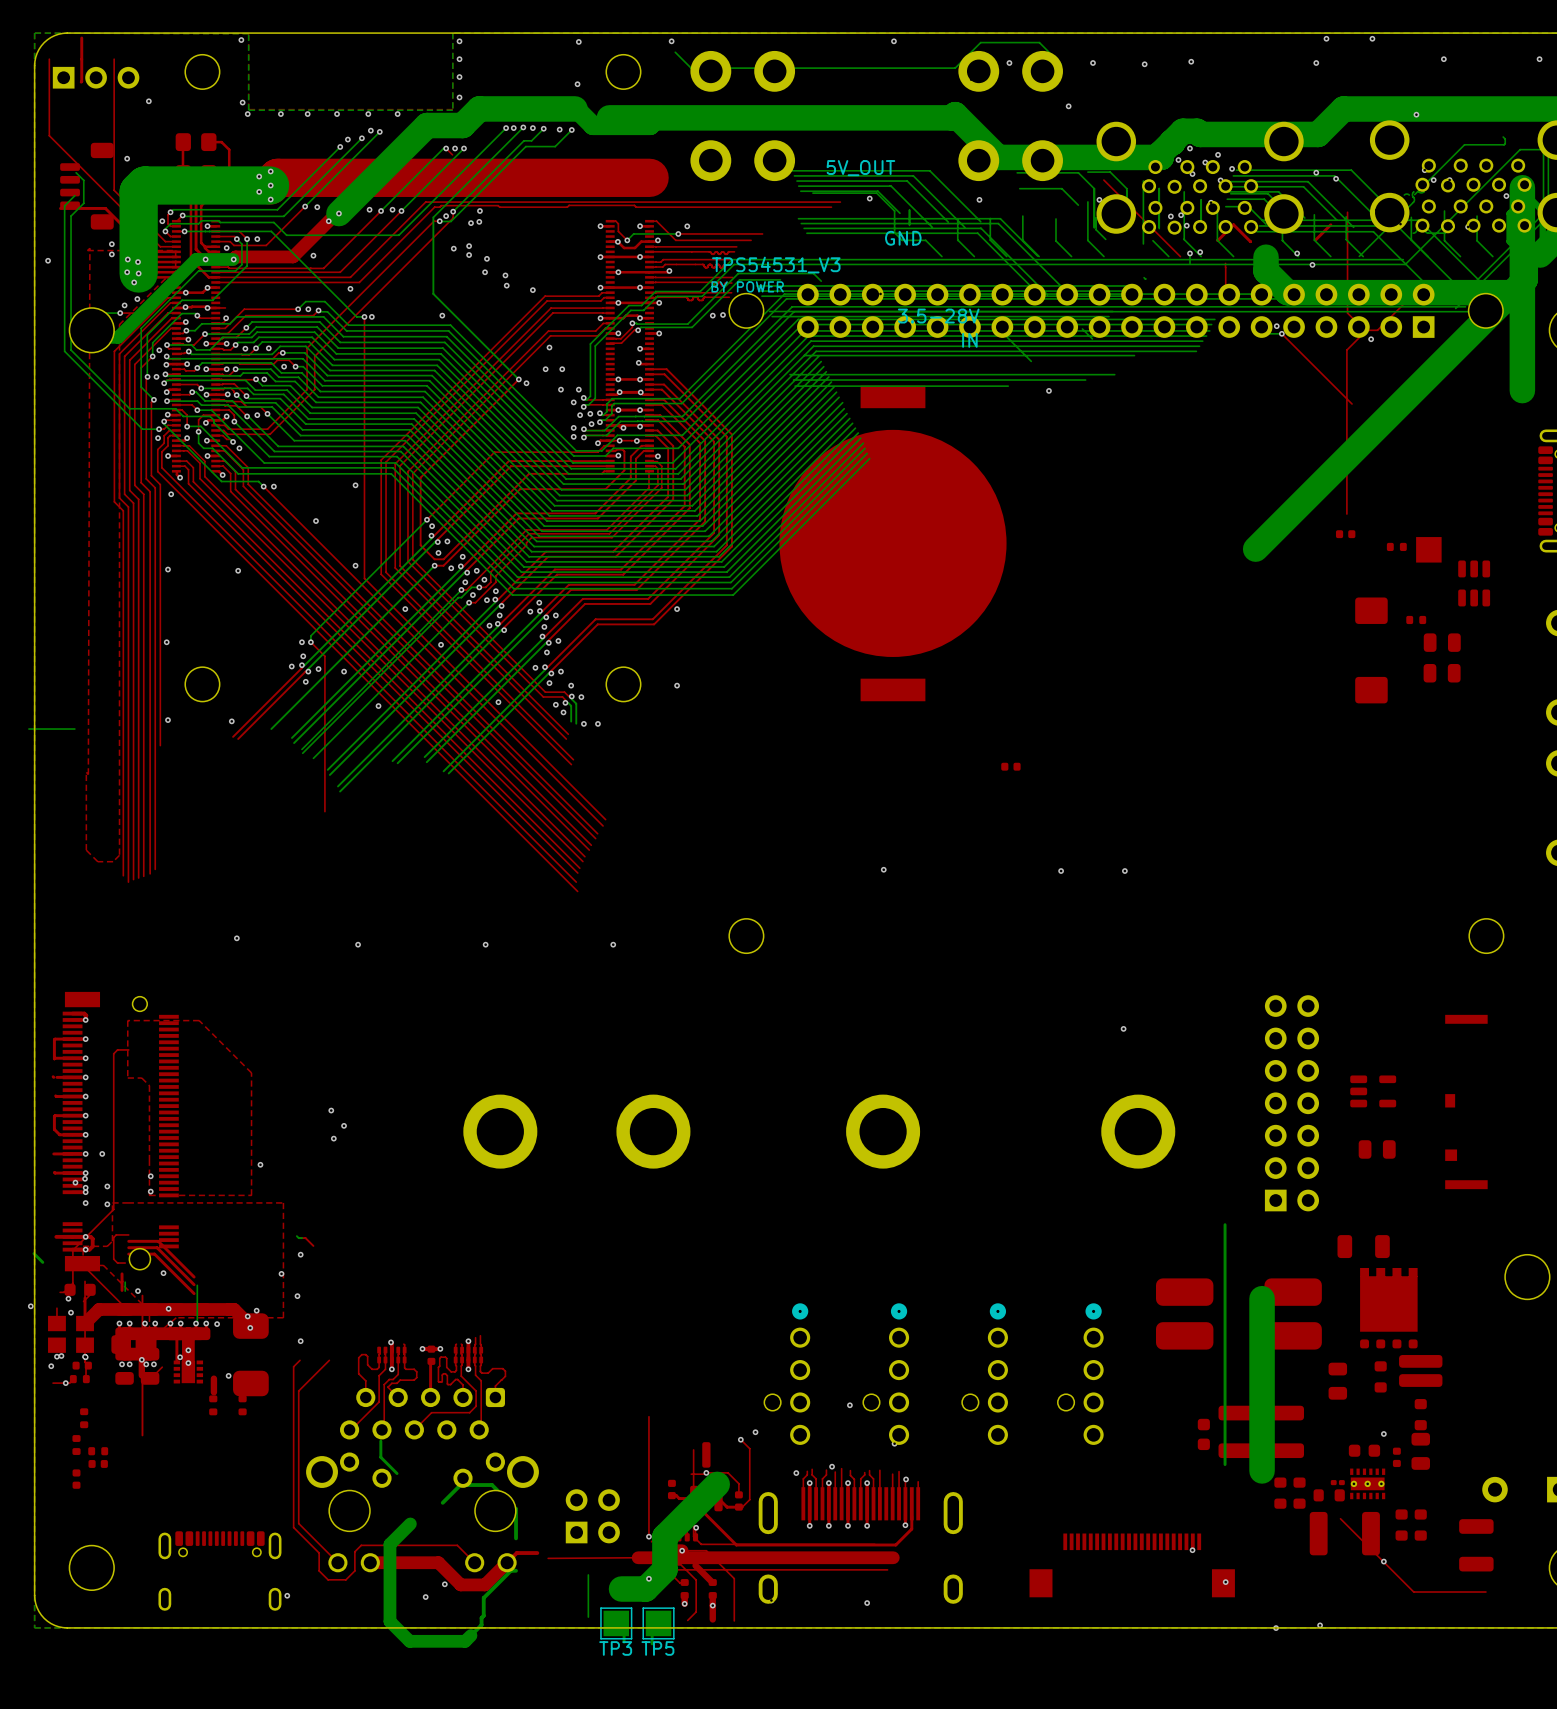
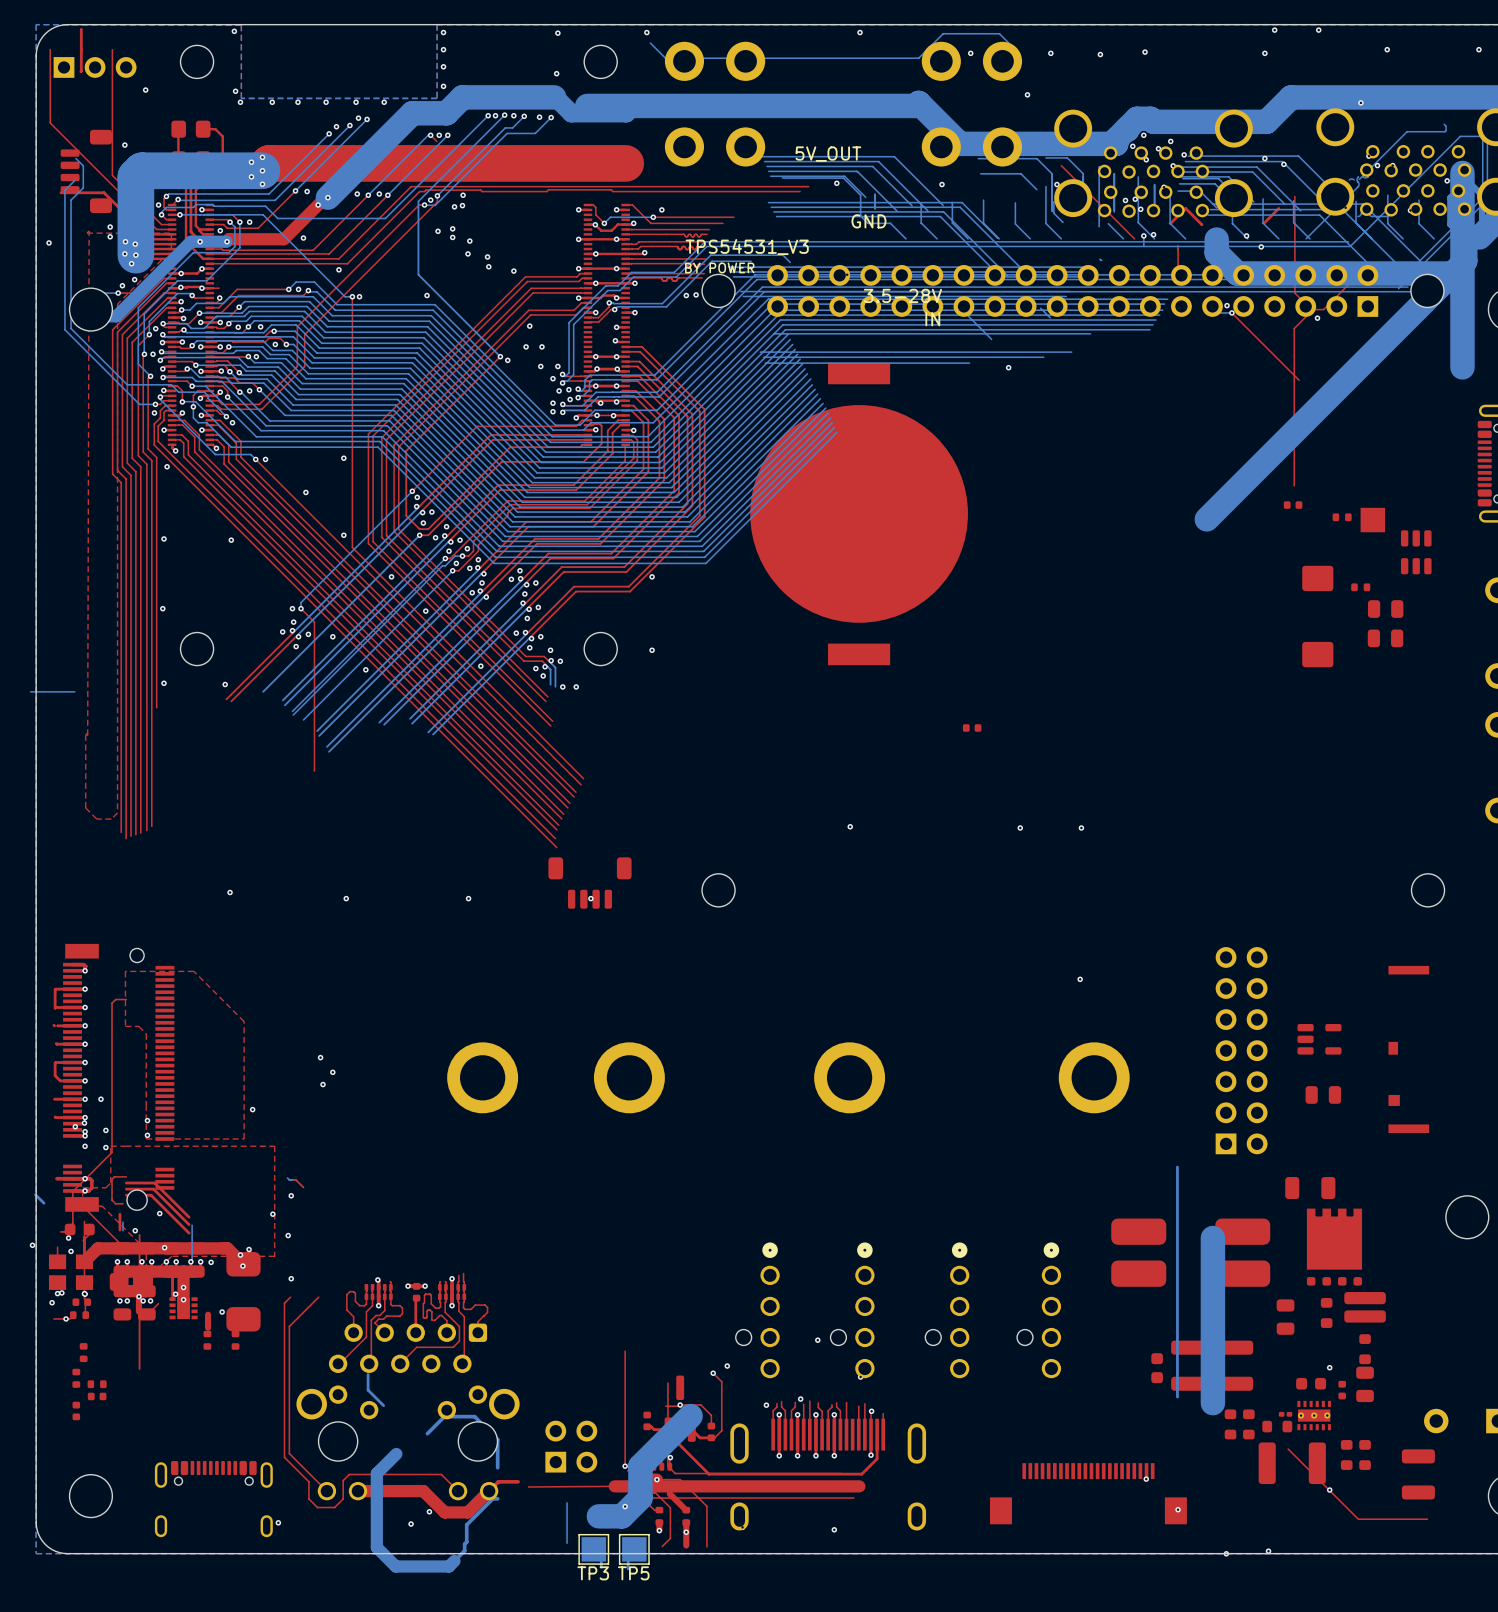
part: none -> (589, 883)

